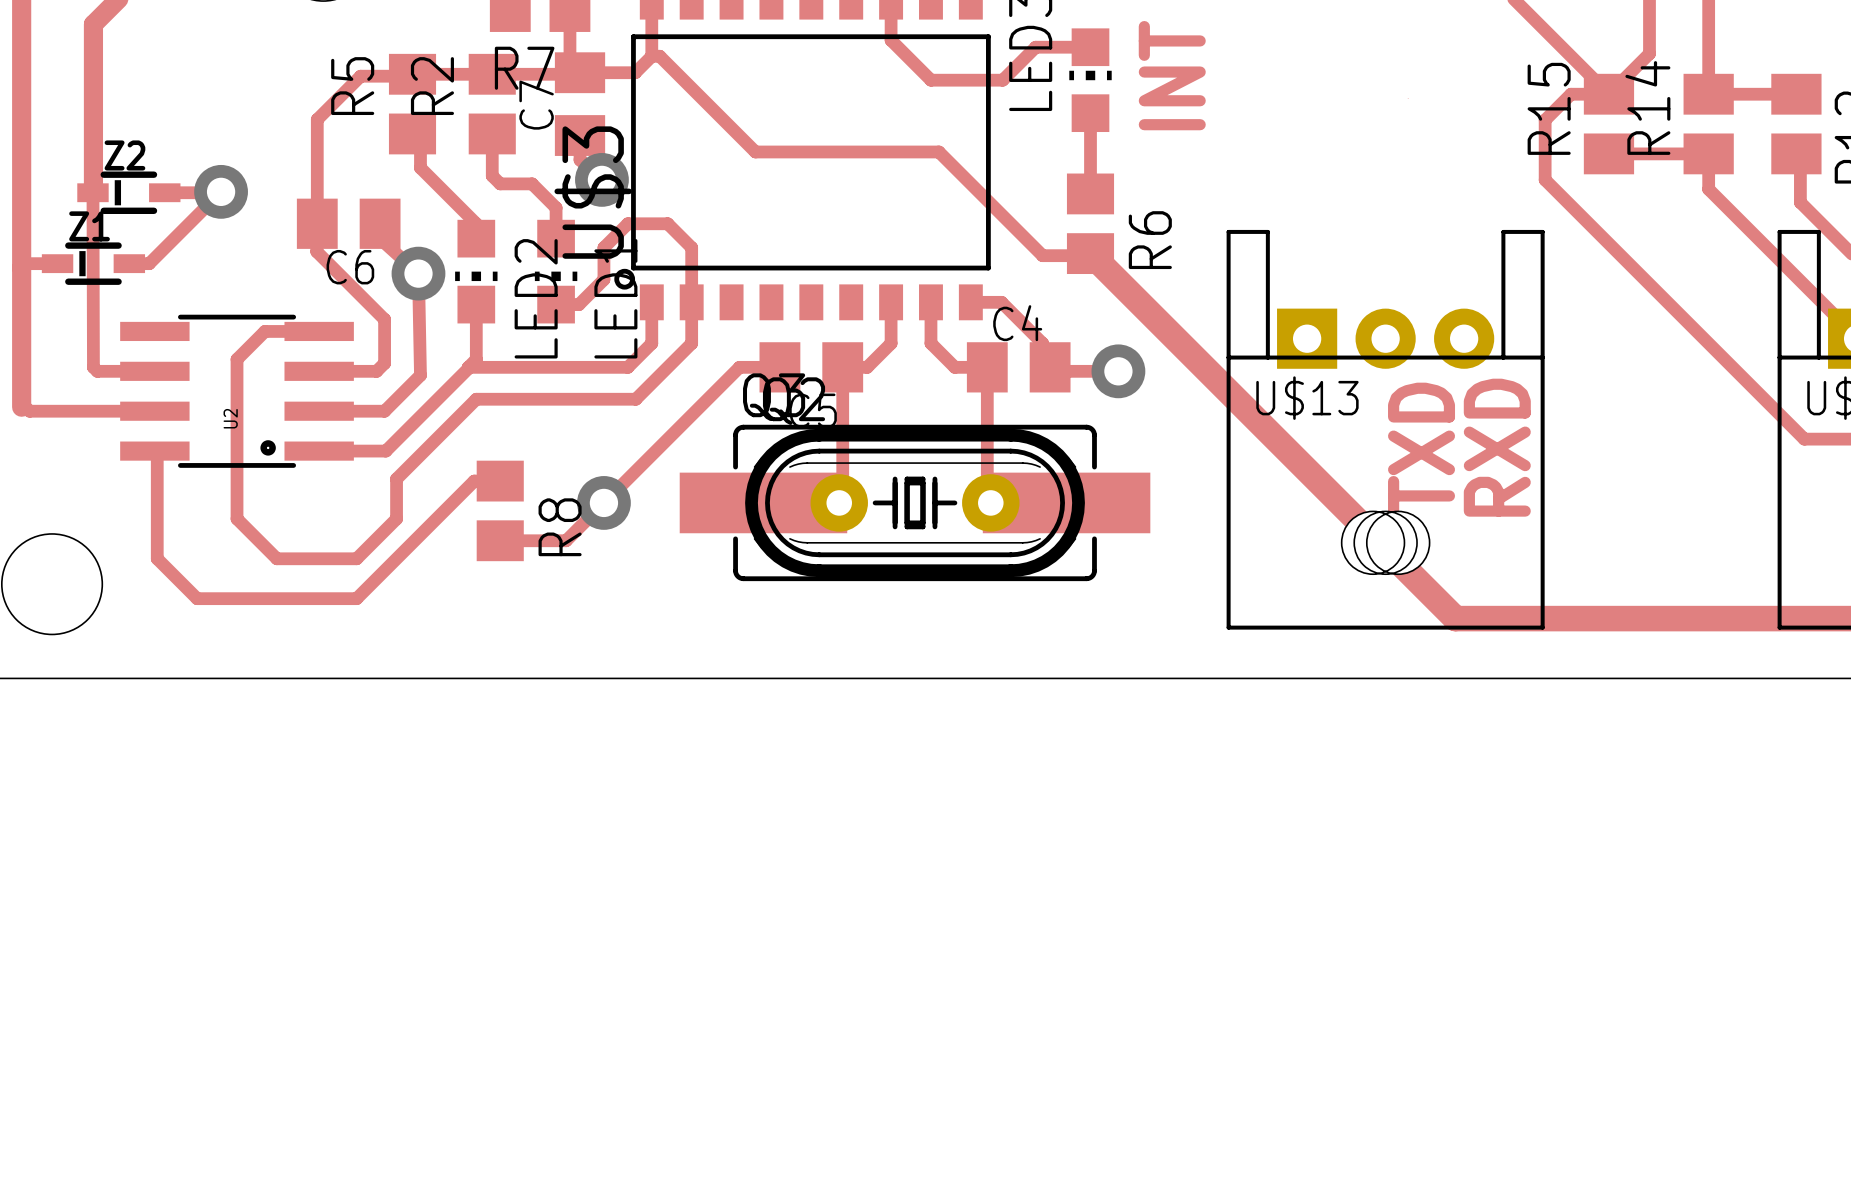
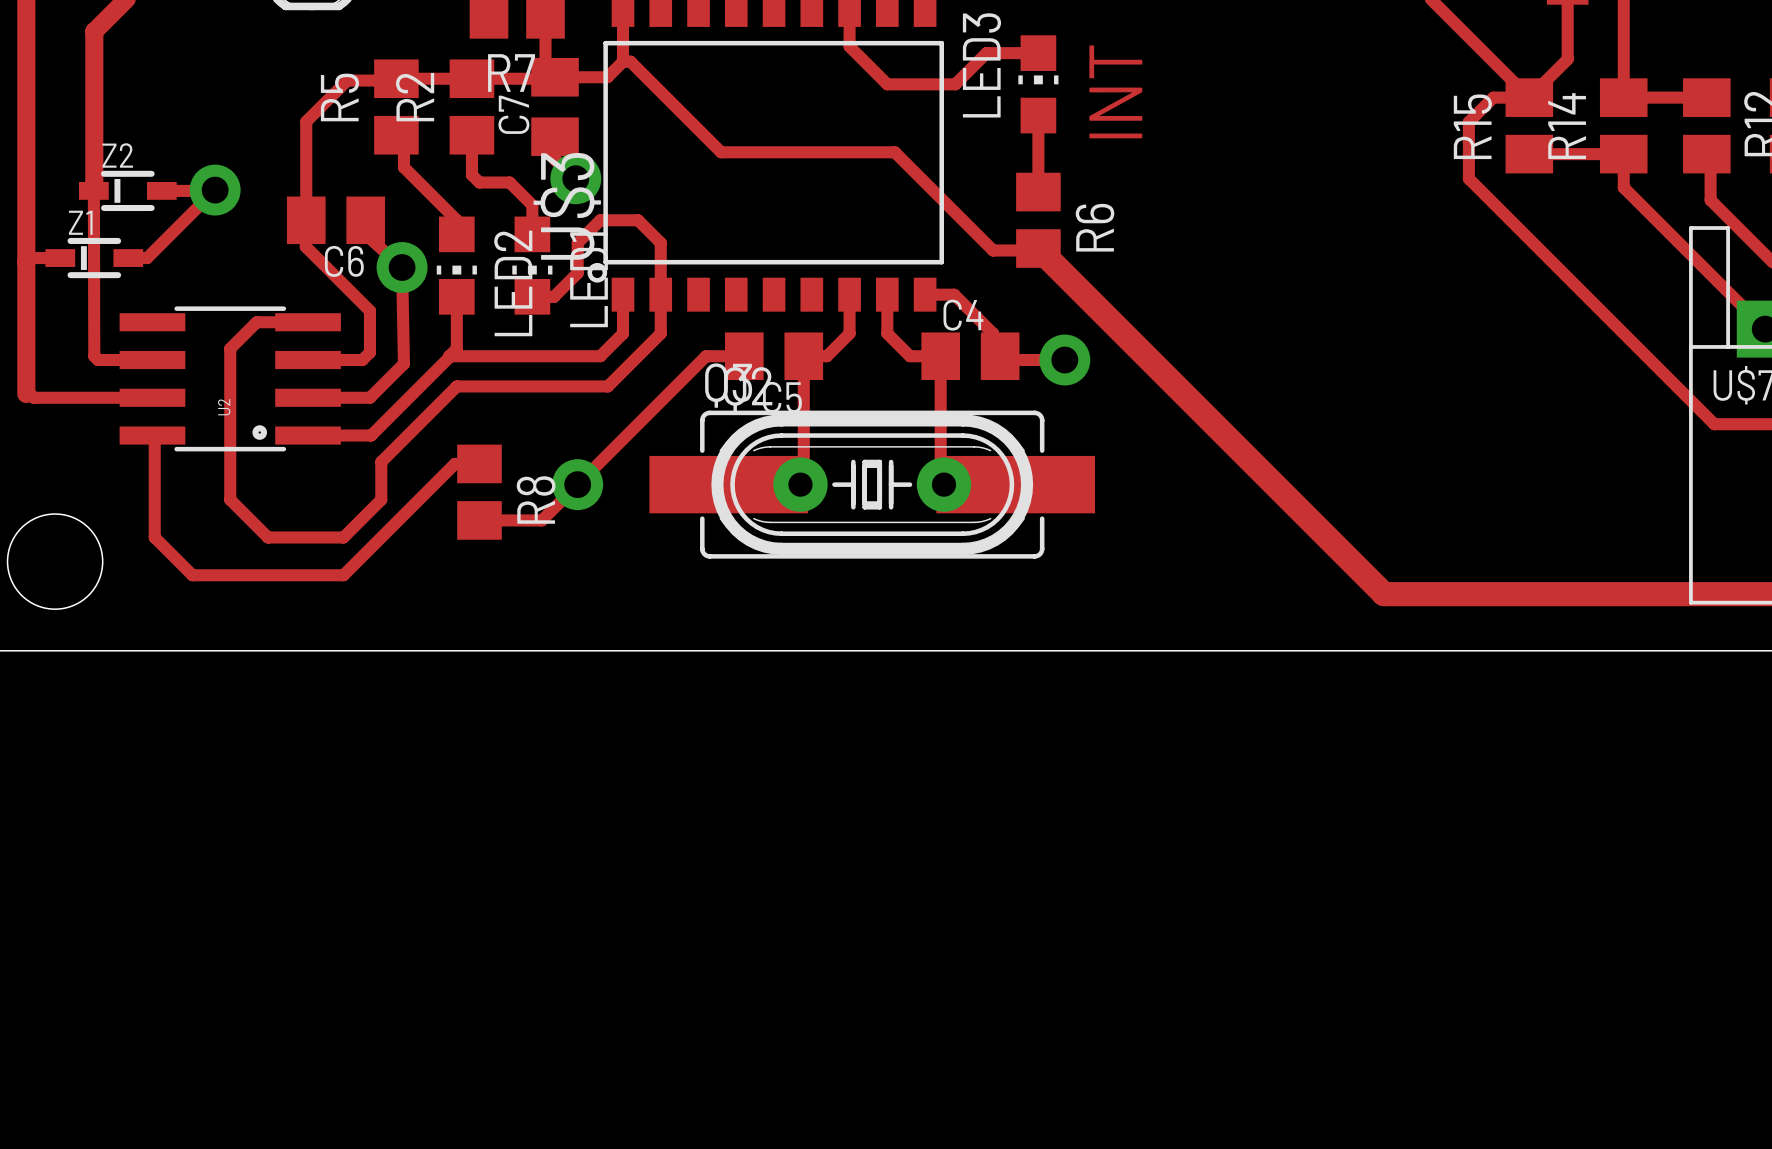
U$13: (1385, 429) -> none
text: RXD (1497, 447) -> none
text: TXD (1421, 449) -> none

